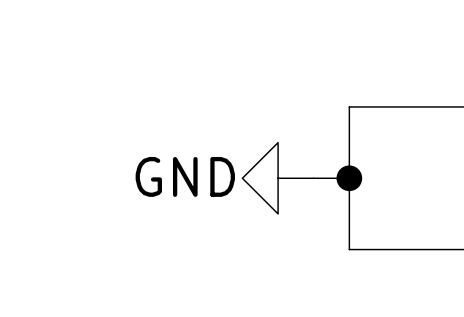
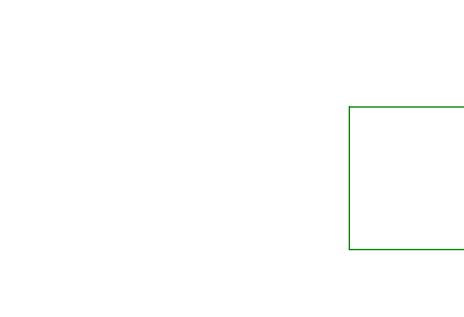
power symbol: GND (278, 178) -> none
wire: (313, 178) (349, 178) -> none
junction: (349, 178) -> none

